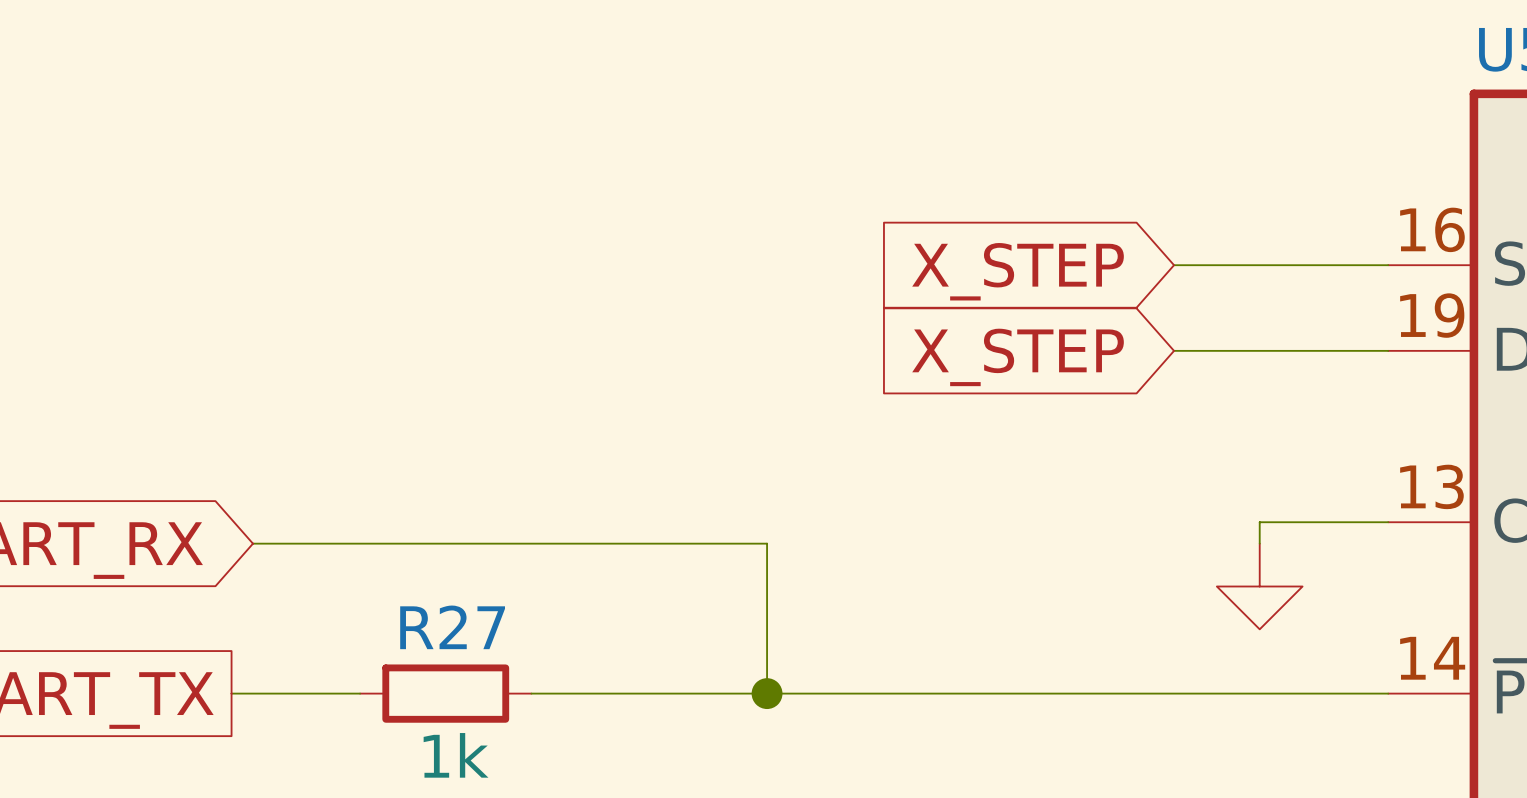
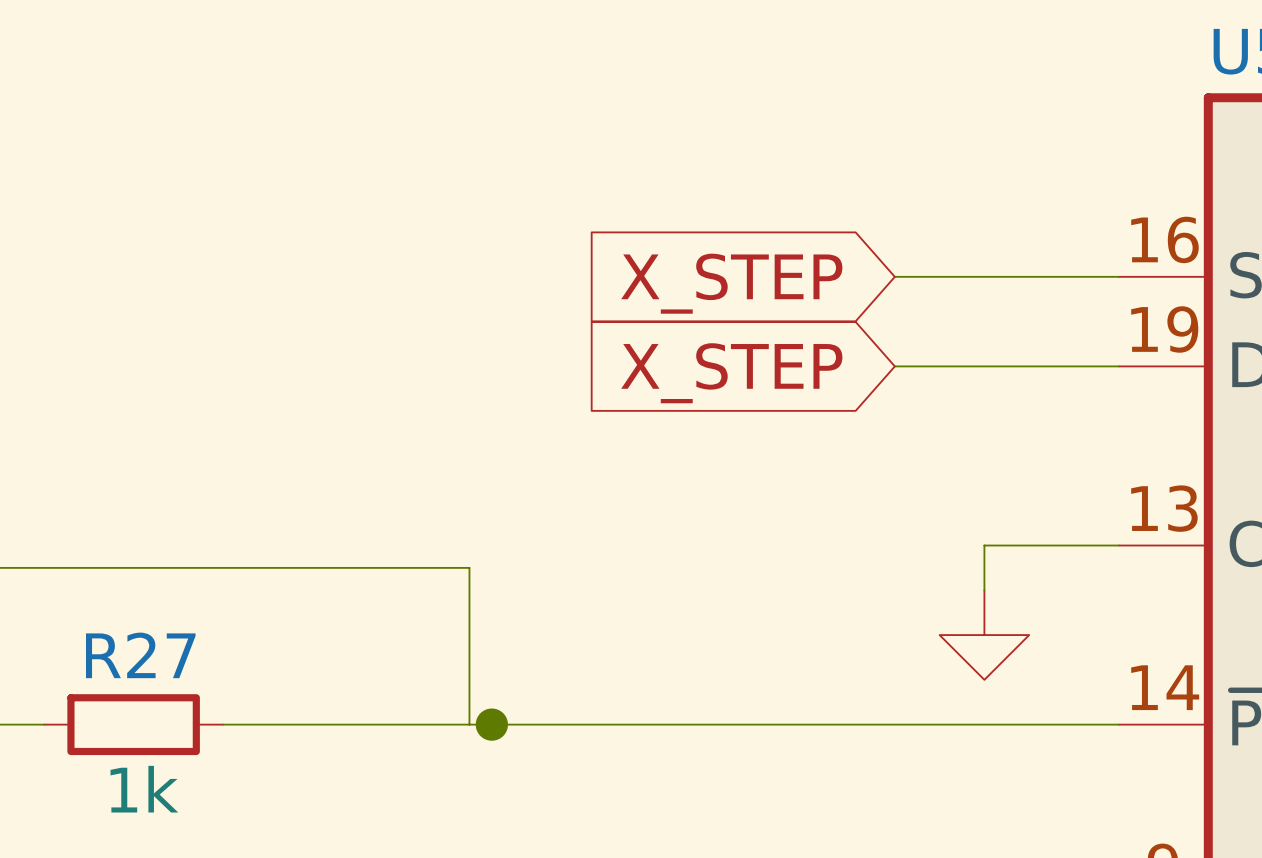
power symbol position: (1259, 586) -> (984, 635)
junction position: (767, 693) -> (491, 724)

